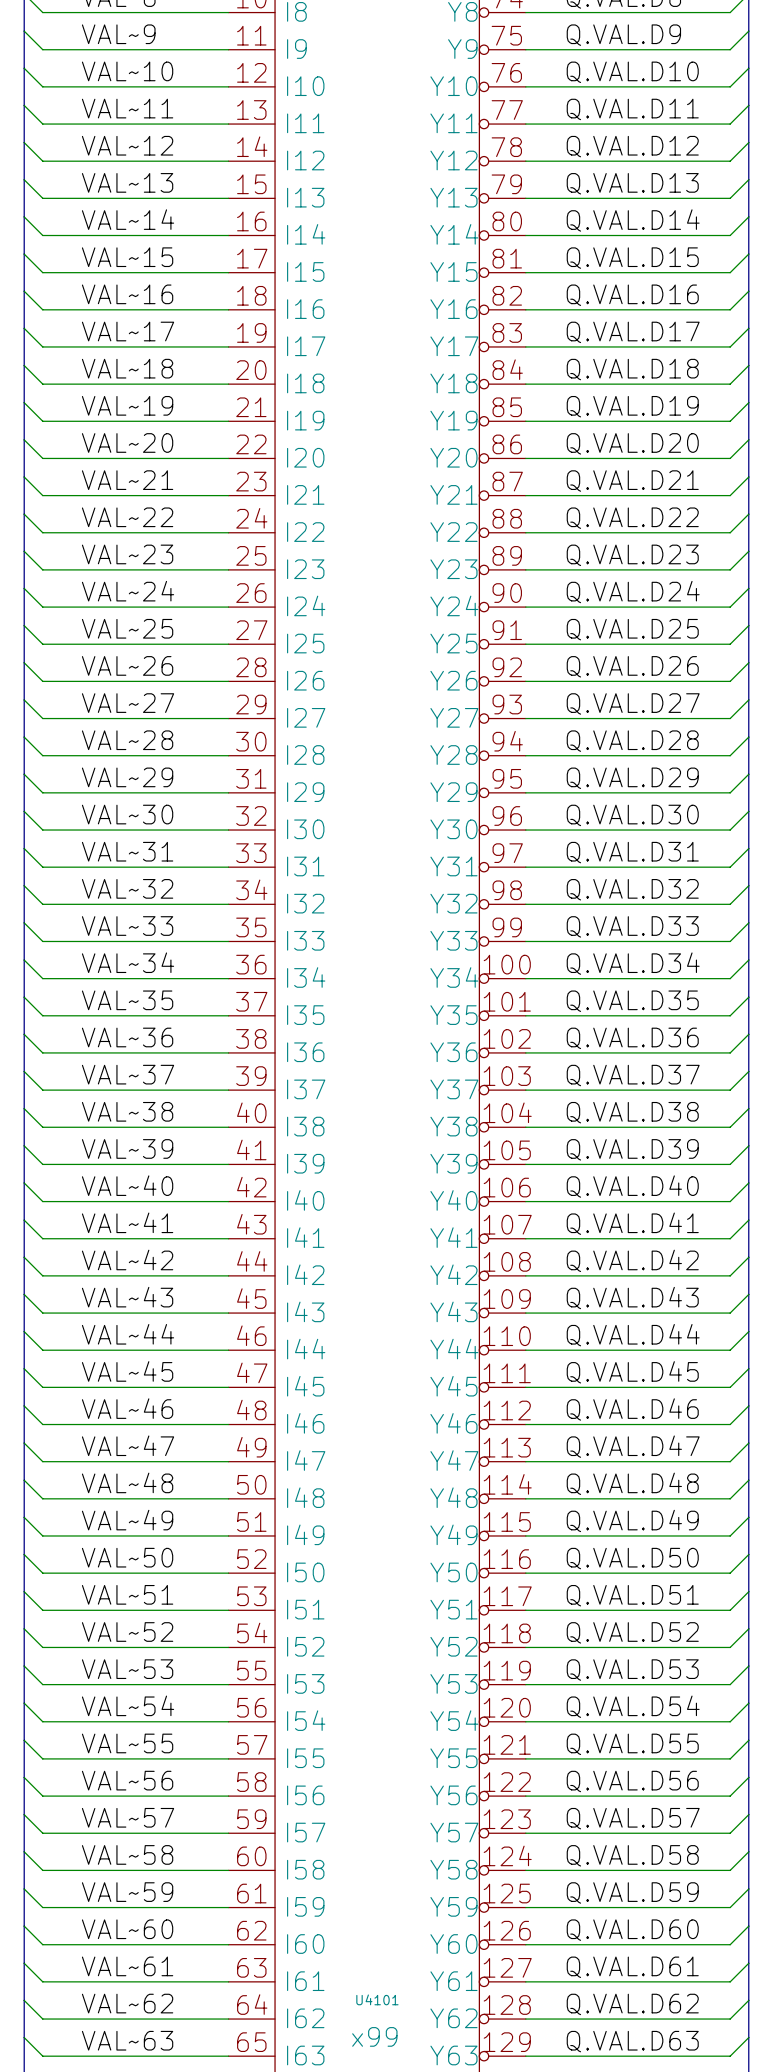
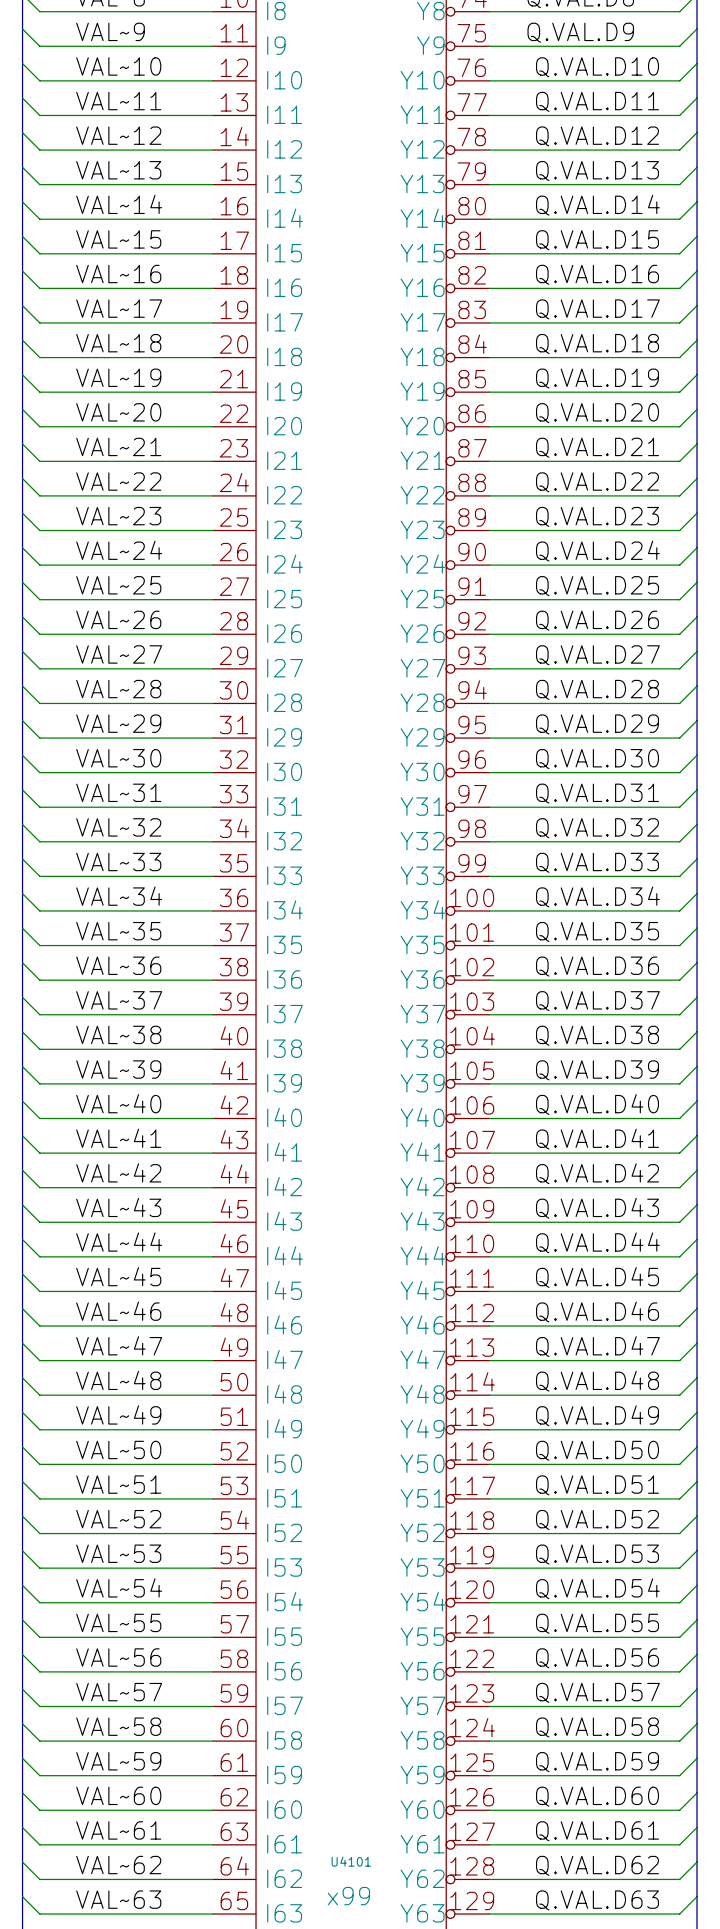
label position: Q.VAL.D10 (632, 72) -> Q.VAL.D10 (597, 67)
label position: Q.VAL.D11 (632, 109) -> Q.VAL.D11 (597, 101)
label position: Q.VAL.D12 (632, 146) -> Q.VAL.D12 (597, 136)
label position: Q.VAL.D13 (632, 183) -> Q.VAL.D13 (597, 171)
label position: Q.VAL.D14 (633, 220) -> Q.VAL.D14 (597, 205)
label position: Q.VAL.D15 (632, 258) -> Q.VAL.D15 (597, 240)
label position: Q.VAL.D16 (632, 295) -> Q.VAL.D16 (597, 274)
label position: Q.VAL.D17 (633, 332) -> Q.VAL.D17 (597, 309)
label position: Q.VAL.D18 (632, 369) -> Q.VAL.D18 (597, 344)
label position: Q.VAL.D19 (632, 406) -> Q.VAL.D19 (597, 378)
label position: Q.VAL.D20 (632, 443) -> Q.VAL.D20 (597, 413)
label position: Q.VAL.D21 (632, 481) -> Q.VAL.D21 (597, 447)
label position: Q.VAL.D22 (632, 518) -> Q.VAL.D22 (597, 482)
label position: Q.VAL.D23 (632, 555) -> Q.VAL.D23 (597, 516)
label position: Q.VAL.D24 (633, 592) -> Q.VAL.D24 (597, 551)
label position: Q.VAL.D25 (632, 629) -> Q.VAL.D25 (597, 586)
label position: Q.VAL.D26 (632, 666) -> Q.VAL.D26 (597, 620)
label position: Q.VAL.D27 (633, 703) -> Q.VAL.D27 (597, 655)
label position: Q.VAL.D28 (632, 741) -> Q.VAL.D28 (597, 689)
label position: Q.VAL.D29 (632, 778) -> Q.VAL.D29 (597, 724)
label position: Q.VAL.D30 (632, 815) -> Q.VAL.D30 (597, 759)
label position: Q.VAL.D31 (632, 852) -> Q.VAL.D31 (597, 793)
label position: Q.VAL.D32 (632, 889) -> Q.VAL.D32 (597, 828)
label position: Q.VAL.D33 (632, 926) -> Q.VAL.D33 (597, 862)
label position: Q.VAL.D34 (633, 963) -> Q.VAL.D34 (597, 896)
label position: Q.VAL.D35 (632, 1001) -> Q.VAL.D35 (597, 931)
label position: Q.VAL.D36 (632, 1038) -> Q.VAL.D36 (597, 966)
label position: Q.VAL.D37 (633, 1075) -> Q.VAL.D37 (597, 1001)
label position: Q.VAL.D38 (632, 1112) -> Q.VAL.D38 (597, 1035)
label position: Q.VAL.D39 (632, 1149) -> Q.VAL.D39 (597, 1070)
label position: Q.VAL.D40 (632, 1186) -> Q.VAL.D40 (597, 1104)
label position: Q.VAL.D41 (632, 1223) -> Q.VAL.D41 (597, 1139)
label position: Q.VAL.D42 (632, 1260) -> Q.VAL.D42 (597, 1173)
label position: Q.VAL.D43 (632, 1298) -> Q.VAL.D43 (597, 1208)
label position: Q.VAL.D44 (633, 1335) -> Q.VAL.D44 (597, 1242)
label position: Q.VAL.D45 (632, 1372) -> Q.VAL.D45 (597, 1277)
label position: Q.VAL.D46 (632, 1409) -> Q.VAL.D46 (597, 1312)
label position: Q.VAL.D47 (633, 1446) -> Q.VAL.D47 (597, 1346)
label position: Q.VAL.D48 (632, 1483) -> Q.VAL.D48 (597, 1381)
label position: Q.VAL.D49 (632, 1520) -> Q.VAL.D49 (597, 1415)
label position: Q.VAL.D50 (632, 1558) -> Q.VAL.D50 (597, 1450)
label position: Q.VAL.D51 (632, 1595) -> Q.VAL.D51 (597, 1485)
label position: Q.VAL.D52 (632, 1632) -> Q.VAL.D52 (597, 1519)
label position: Q.VAL.D53 (632, 1670) -> Q.VAL.D53 (597, 1554)
label position: Q.VAL.D54 (633, 1706) -> Q.VAL.D54 (597, 1588)
label position: Q.VAL.D55 (632, 1744) -> Q.VAL.D55 (597, 1623)
label position: Q.VAL.D56 (632, 1781) -> Q.VAL.D56 (597, 1658)
label position: Q.VAL.D57 (633, 1818) -> Q.VAL.D57 (597, 1692)
label position: Q.VAL.D58 (632, 1855) -> Q.VAL.D58 (597, 1727)
label position: Q.VAL.D59 (632, 1892) -> Q.VAL.D59 (597, 1762)
label position: Q.VAL.D60 (632, 1930) -> Q.VAL.D60 (597, 1796)
label position: Q.VAL.D61 (632, 1967) -> Q.VAL.D61 (597, 1831)
label position: Q.VAL.D62 (632, 2004) -> Q.VAL.D62 (597, 1865)
label position: Q.VAL.D63 (632, 2041) -> Q.VAL.D63 (597, 1900)

